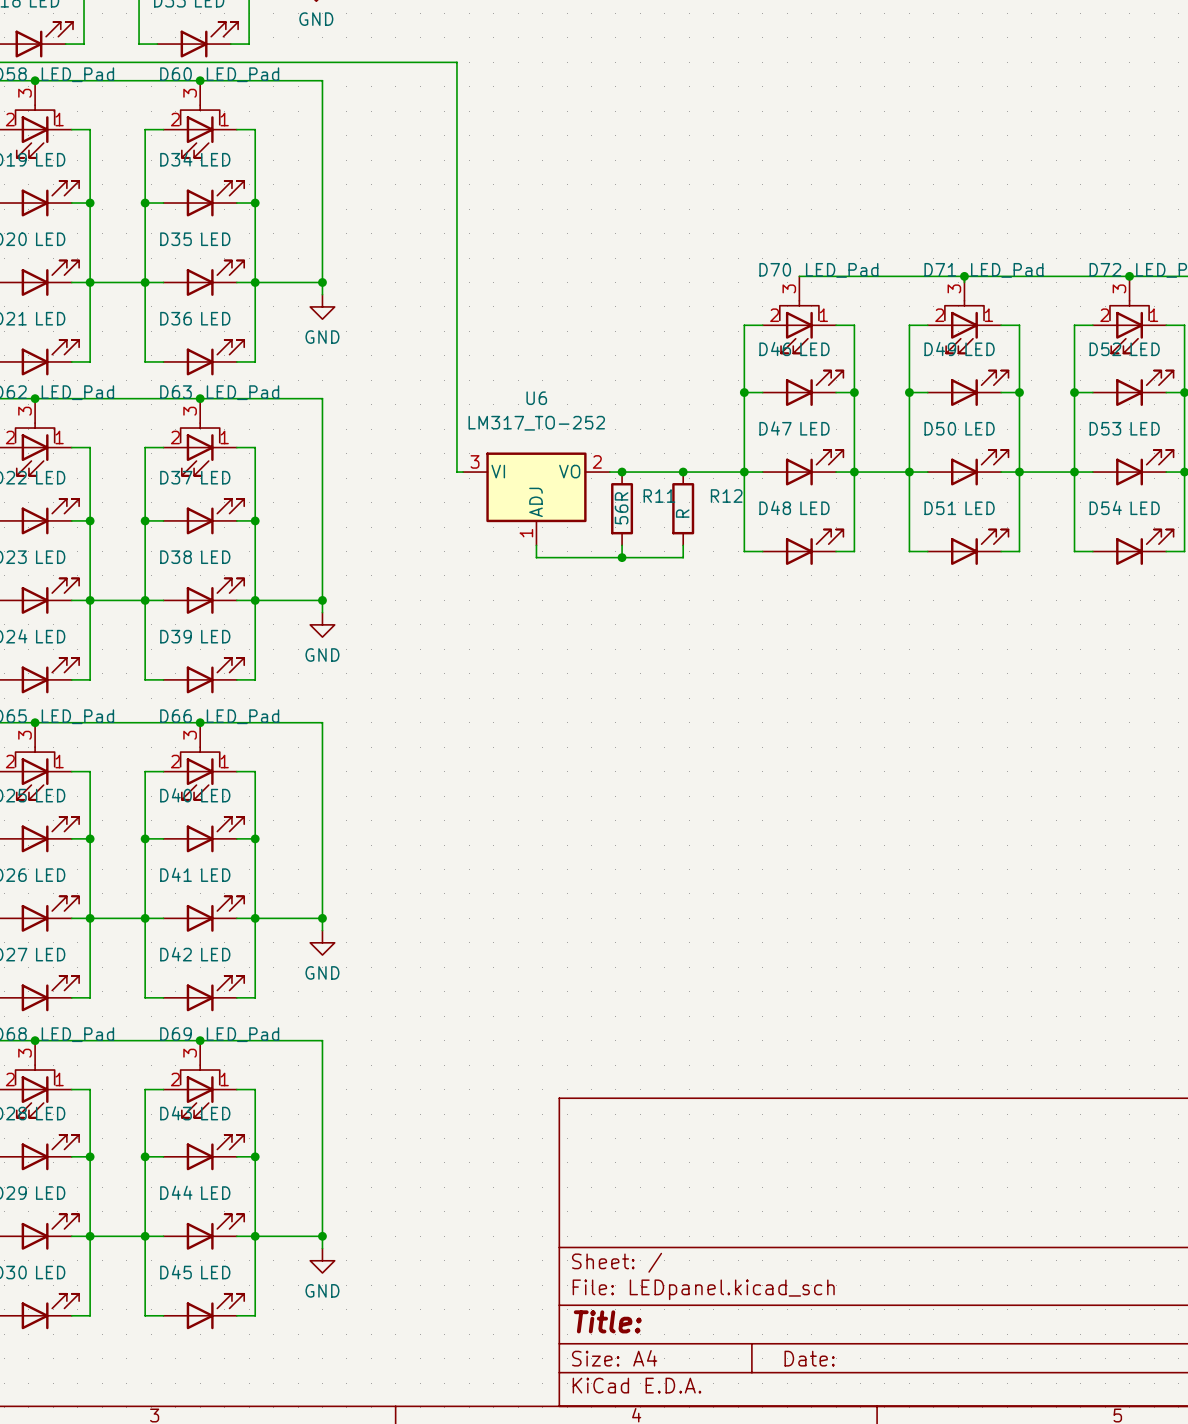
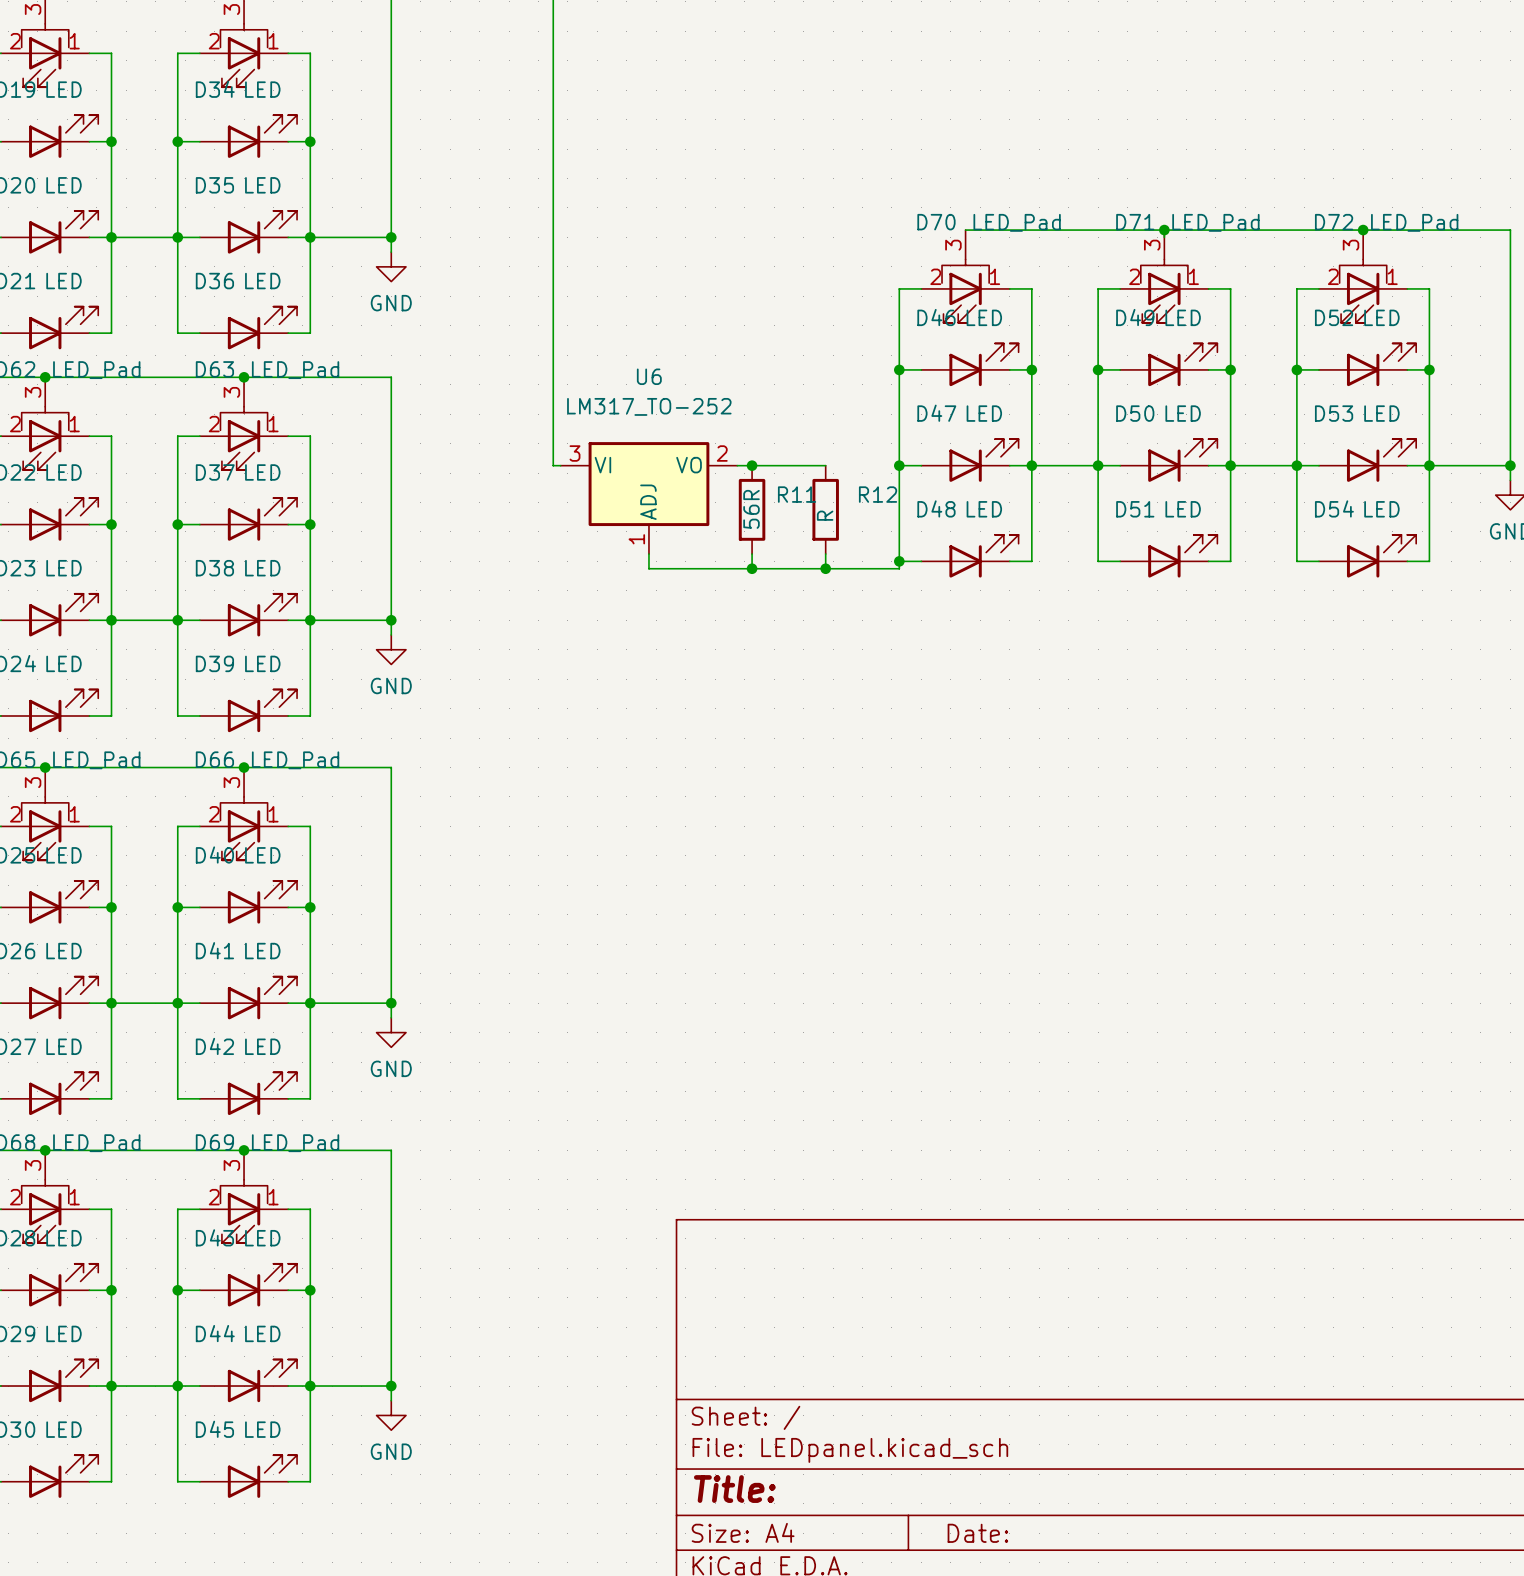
wire: (683, 472) (744, 472) -> none
junction: (683, 472) -> none
wire: none -> (899, 561) (899, 568) (825, 568)
junction: none -> (899, 561)
junction: none -> (825, 568)

